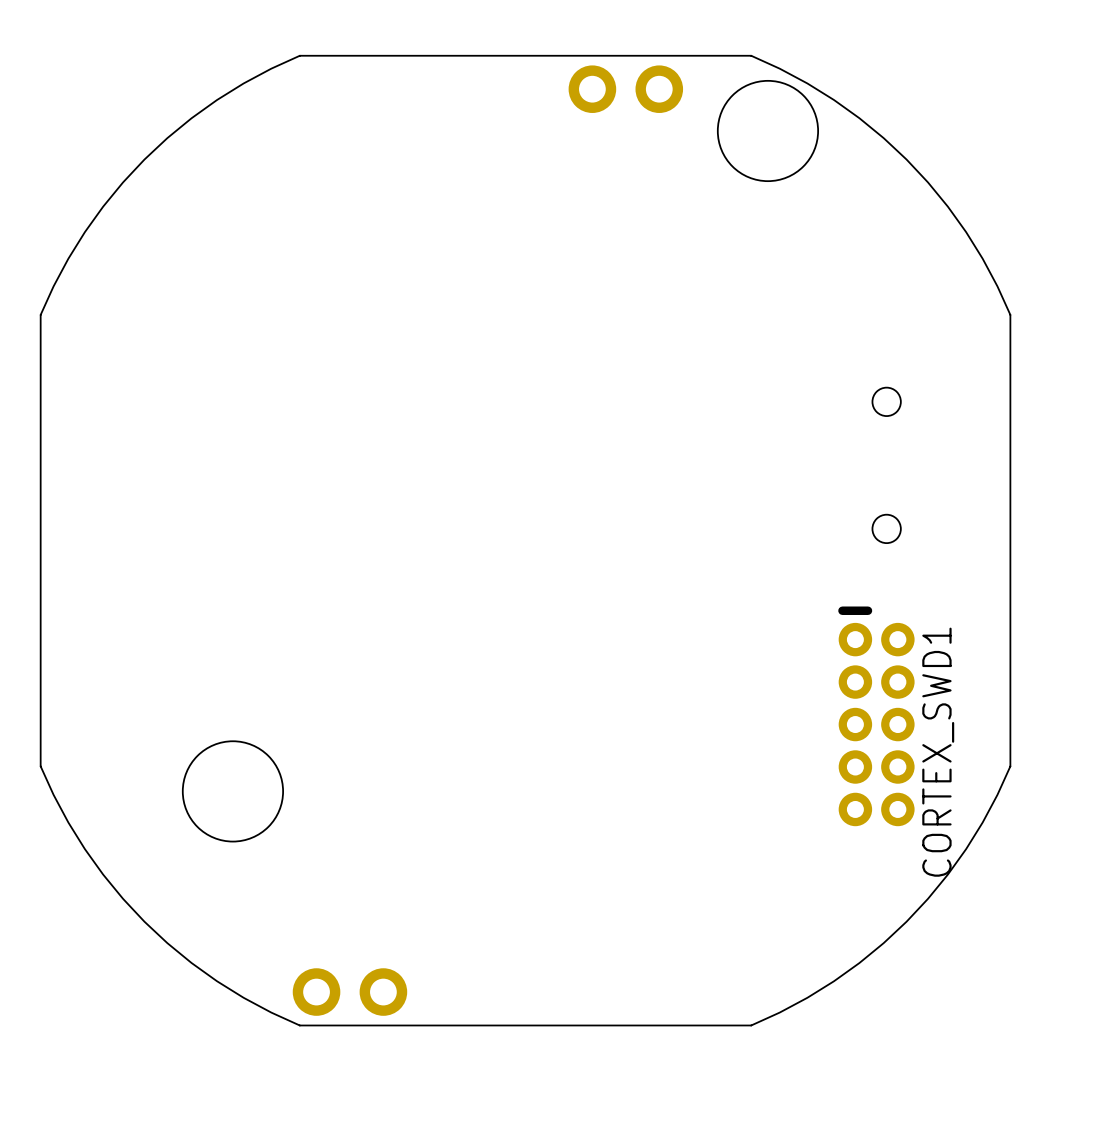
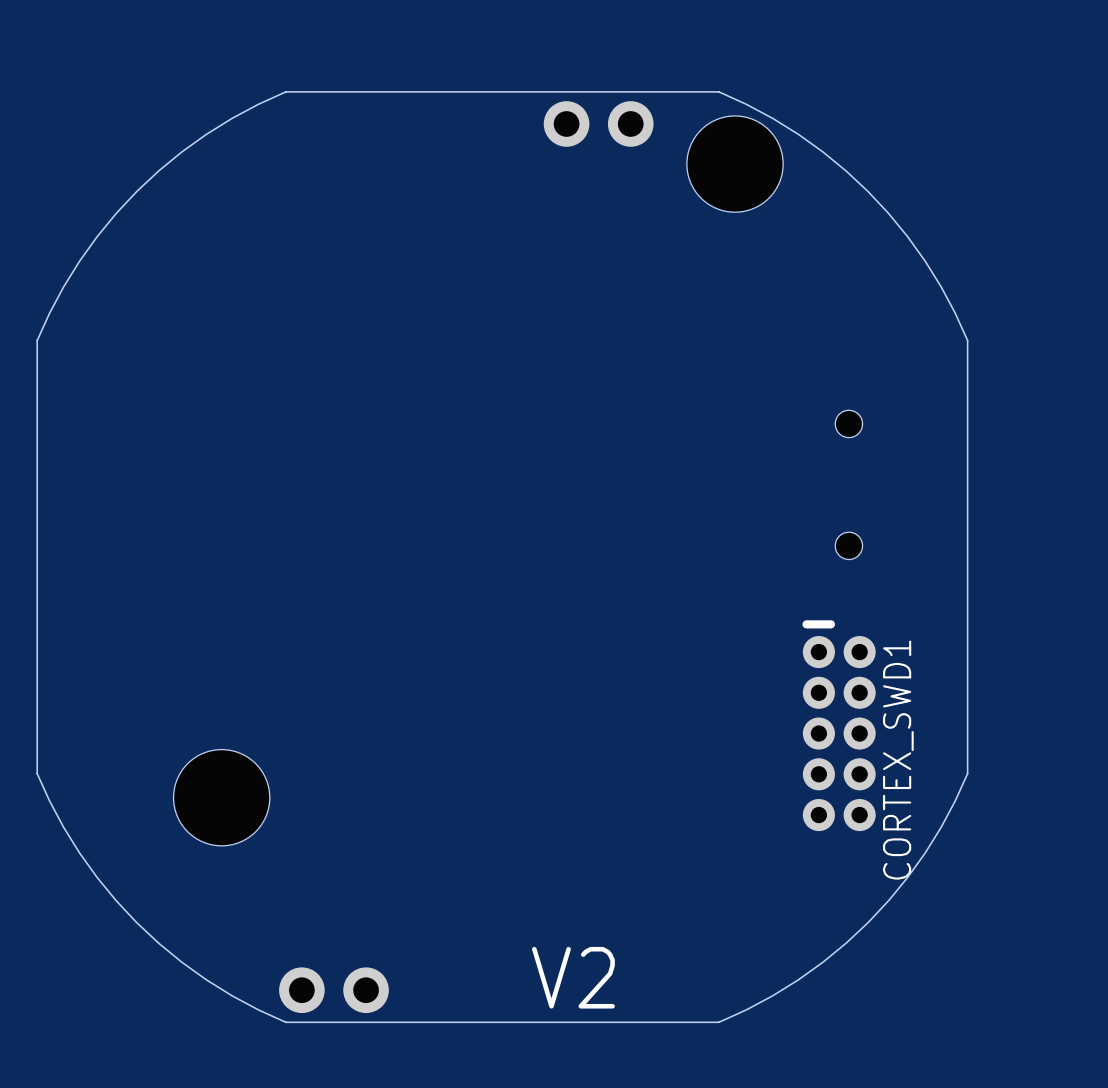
text: none -> V2 (573, 977)

